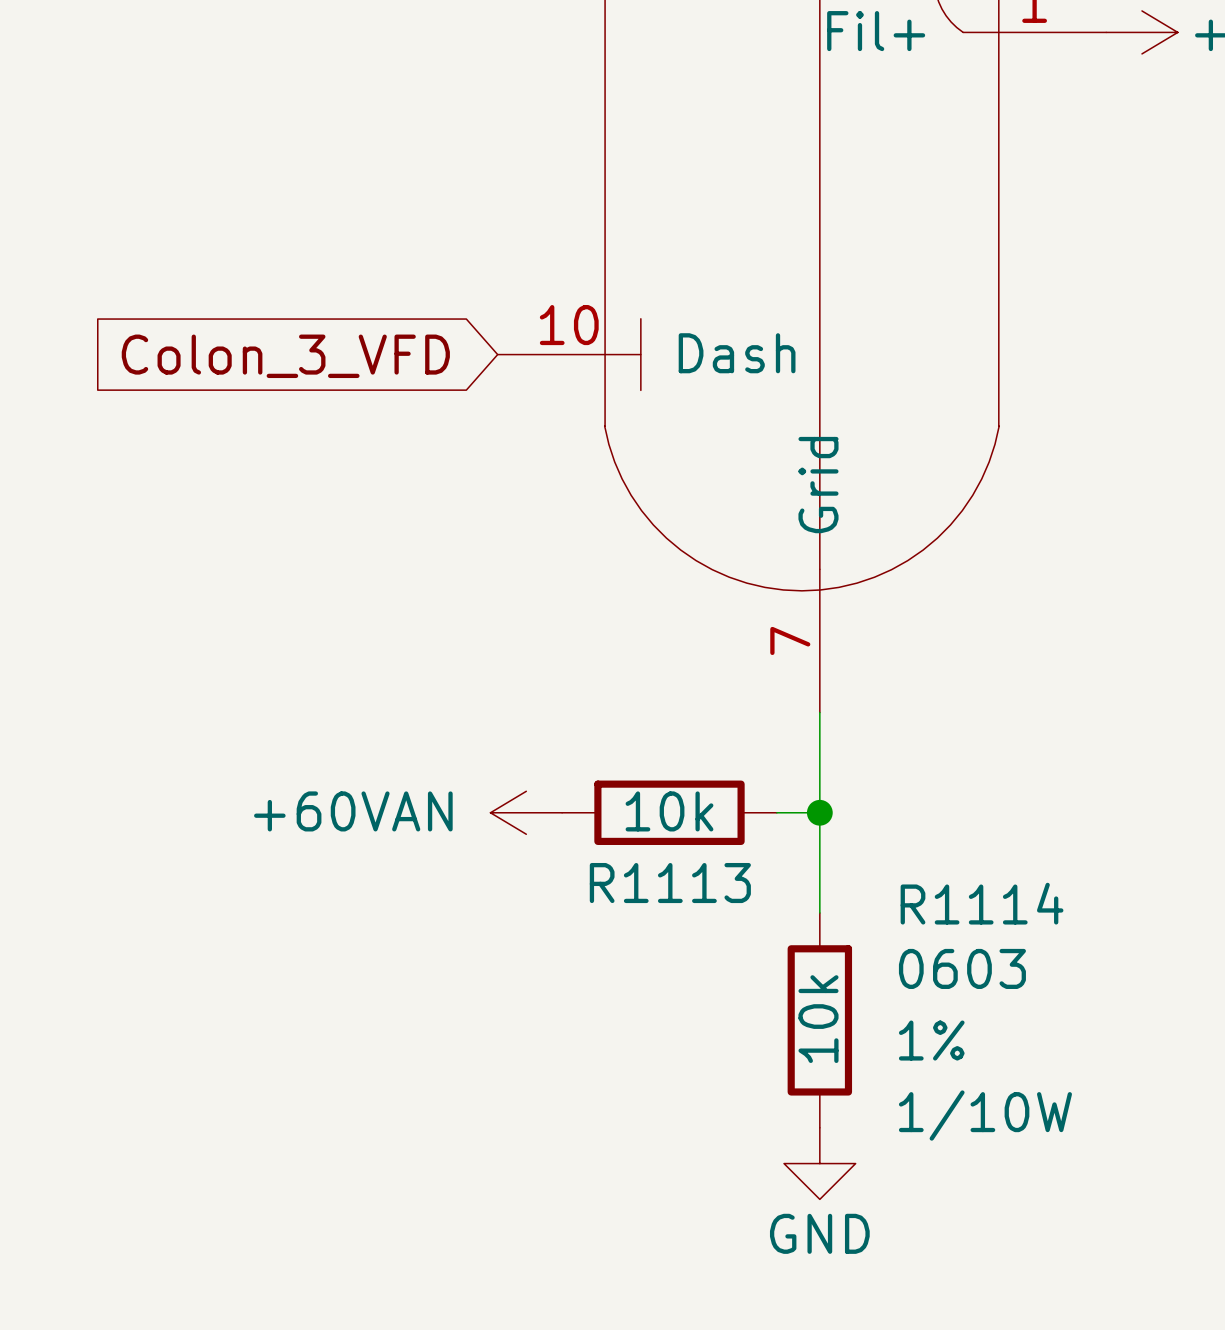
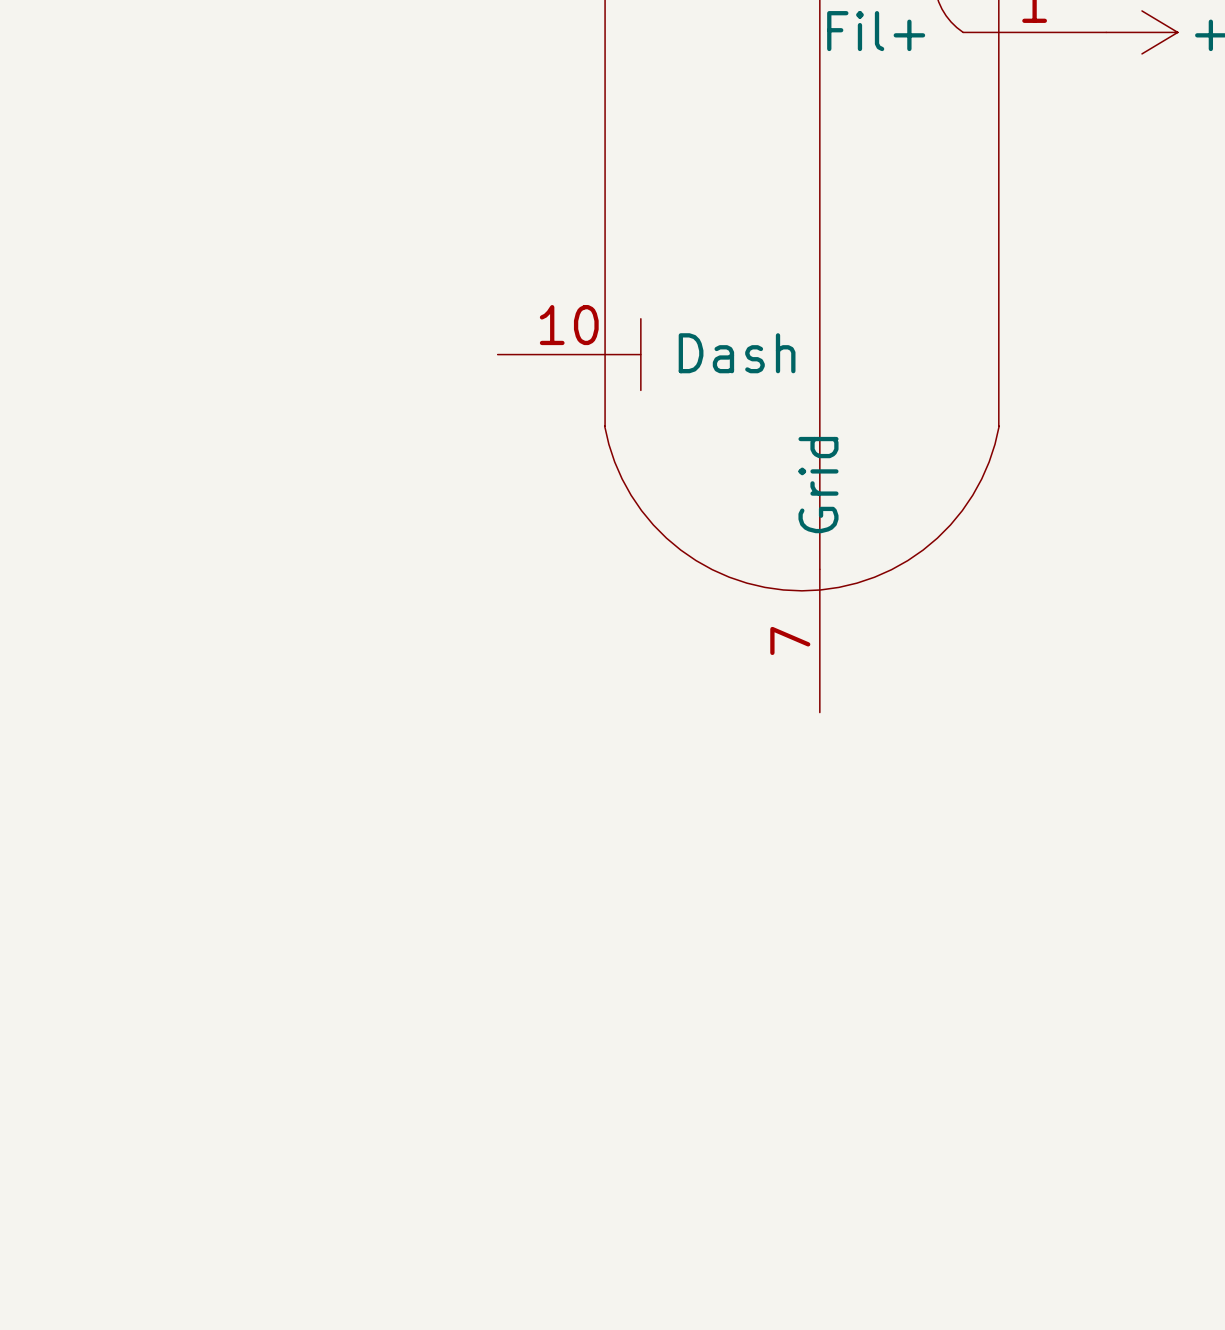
global label: Colon_3_VFD (285, 356) -> none
wire: (819, 712) (819, 913) -> none
power symbol: +60VAN (526, 812) -> none
R1113: 10k (669, 812) -> none
wire: (776, 812) (819, 812) -> none
junction: (819, 812) -> none
R1114: 10k (819, 1020) -> none
power symbol: GND (819, 1163) -> none

